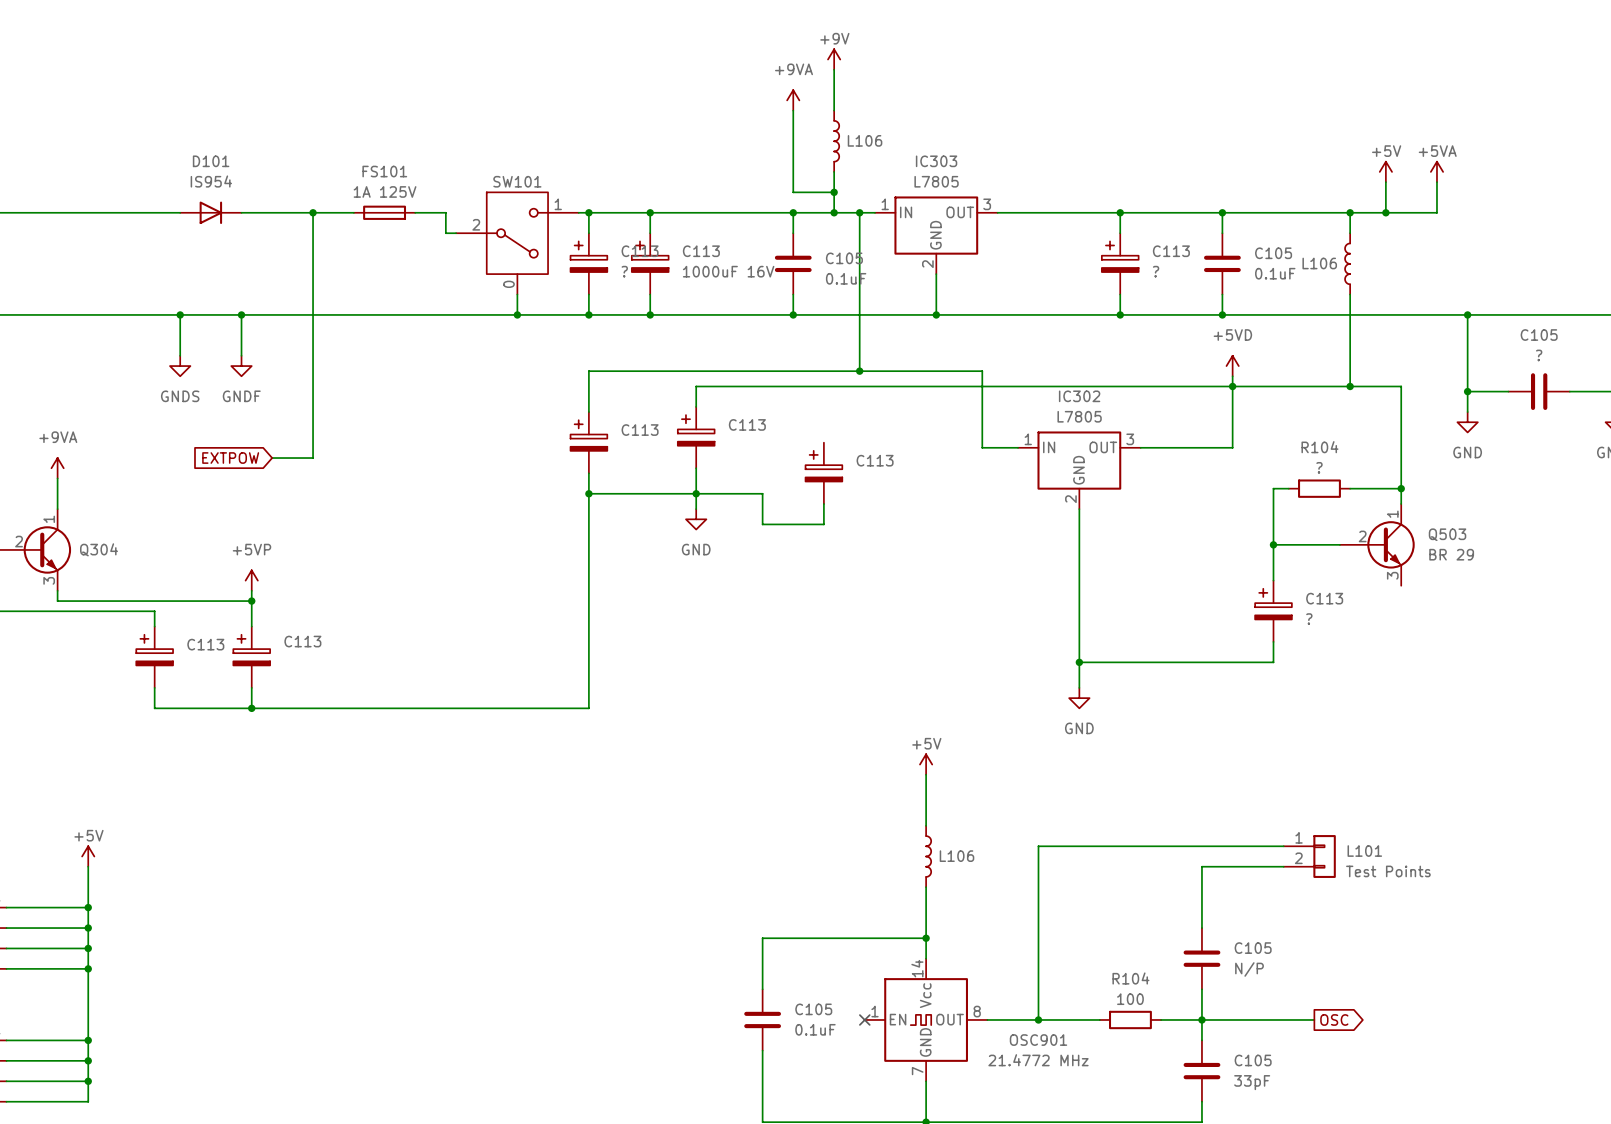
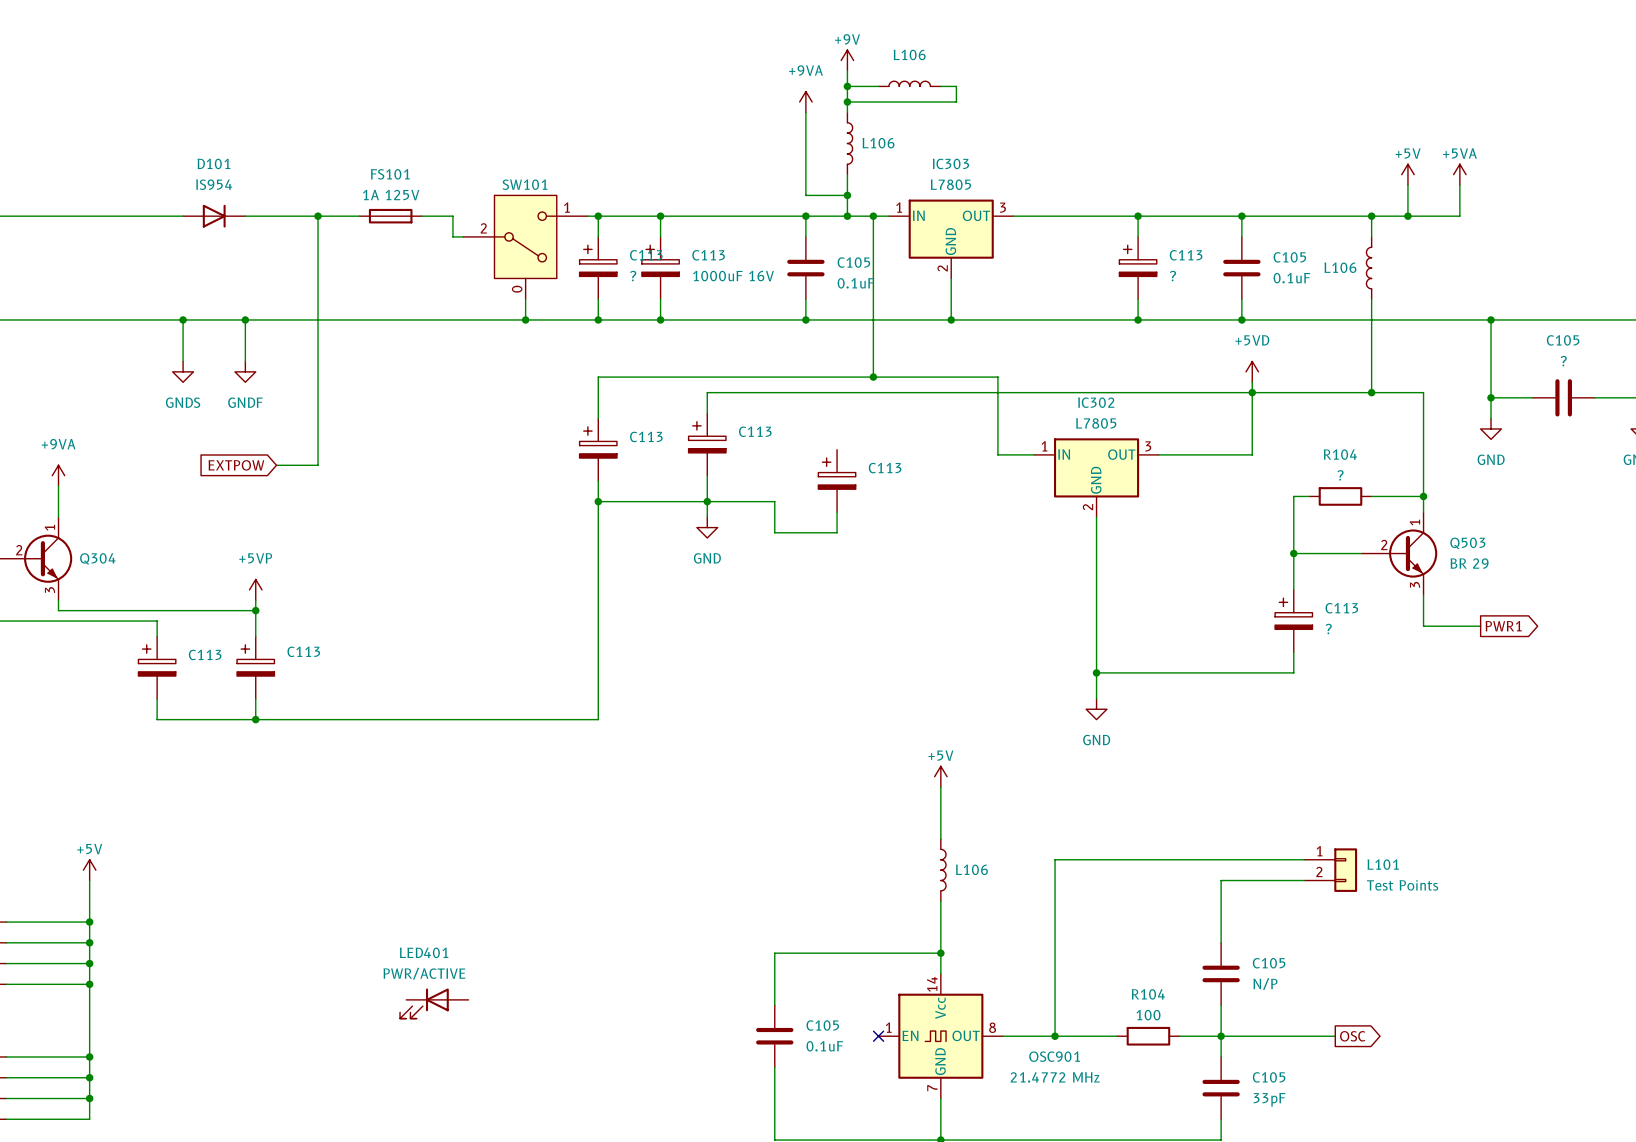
L106: none -> (909, 83)
wire: none -> (847, 86) (878, 86)
junction: none -> (847, 86)
wire: none -> (940, 86) (956, 86) (956, 101) (847, 101)
junction: none -> (847, 101)
wire: none -> (1423, 595) (1423, 626) (1480, 626)
global label: none -> PWR1 (1503, 626)
LED401: none -> PWR/ACTIVE (434, 1003)

